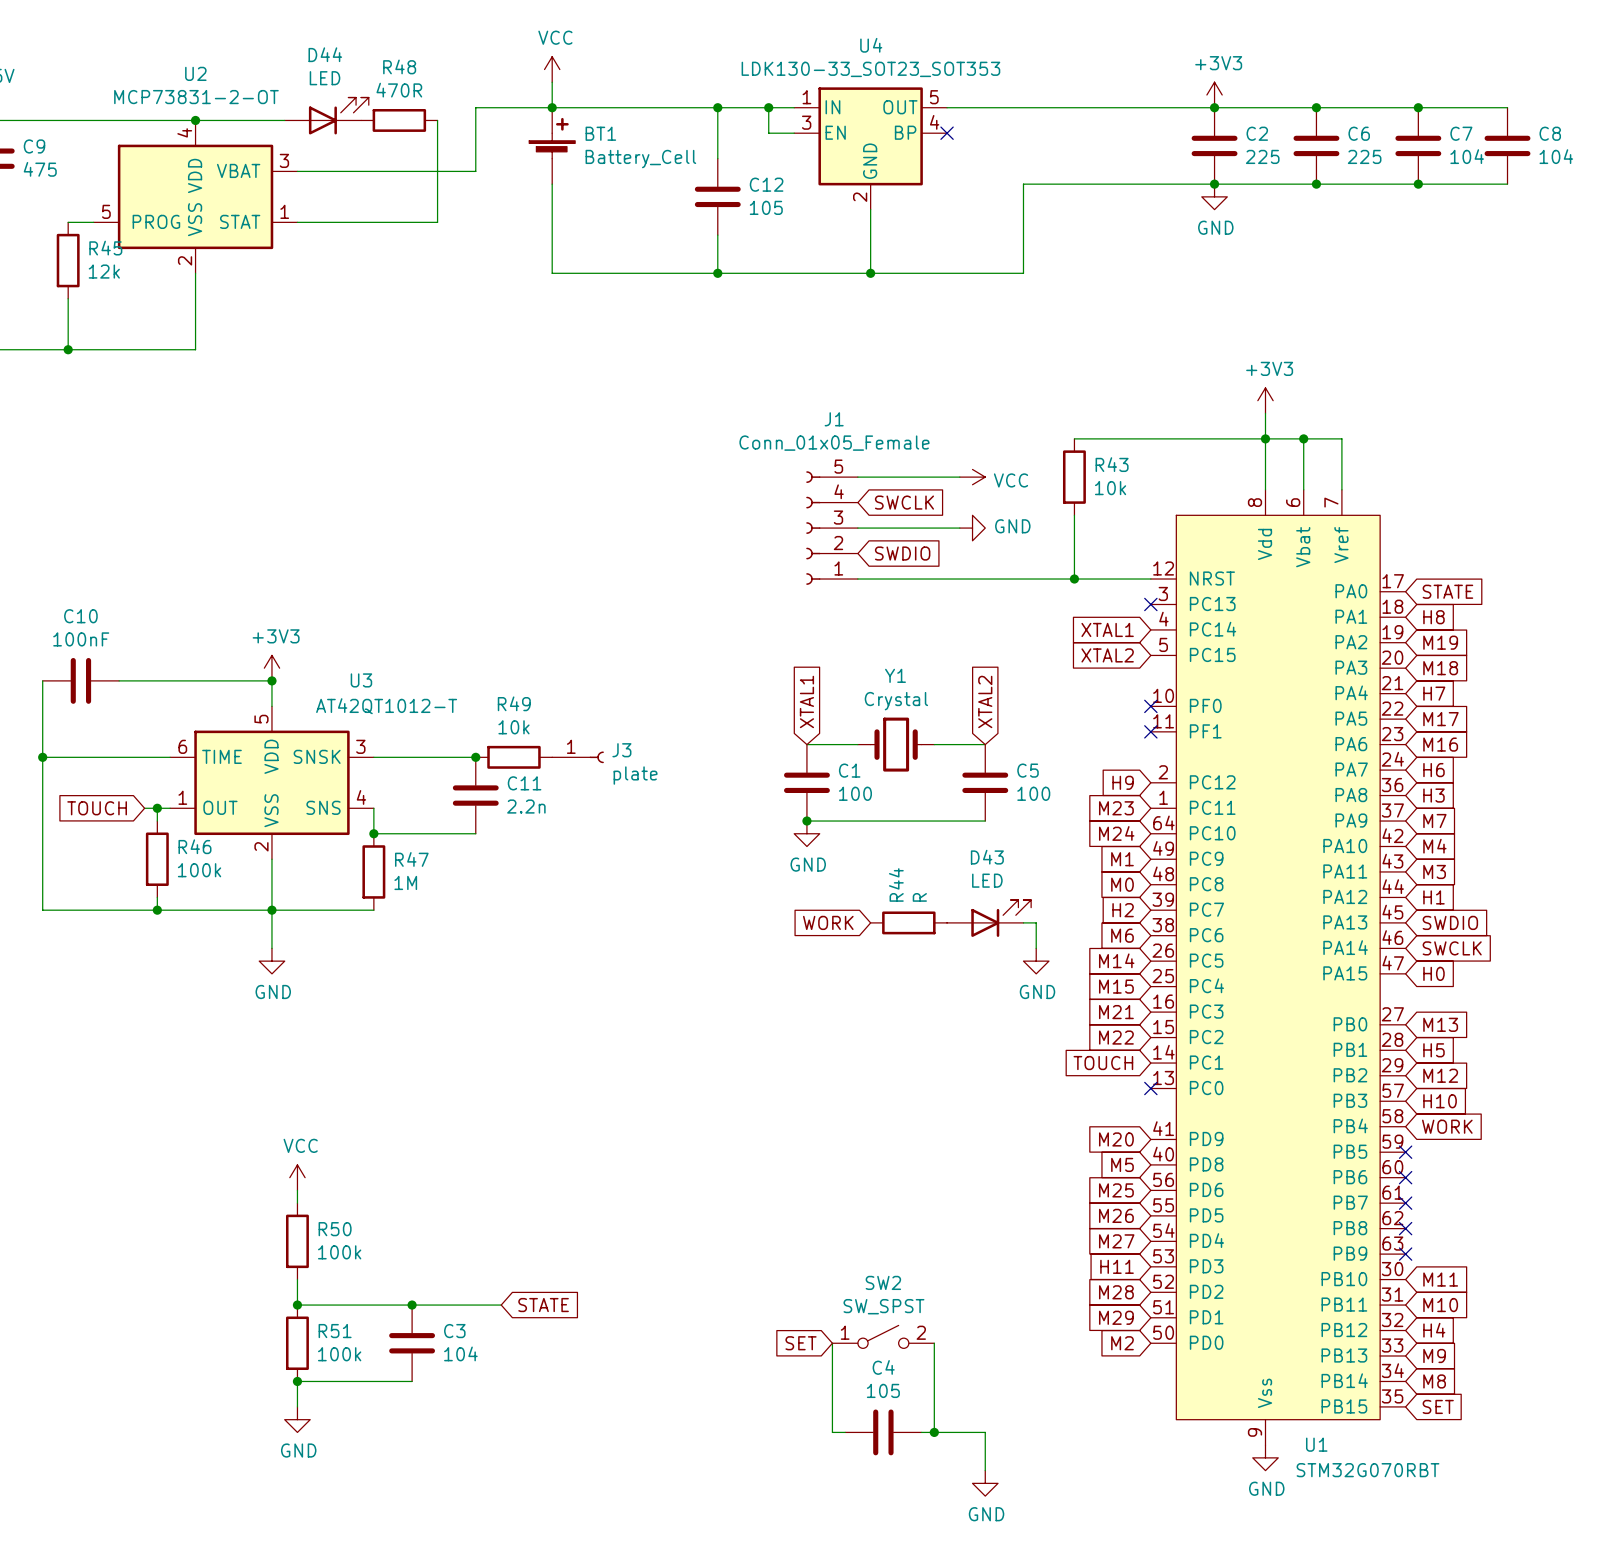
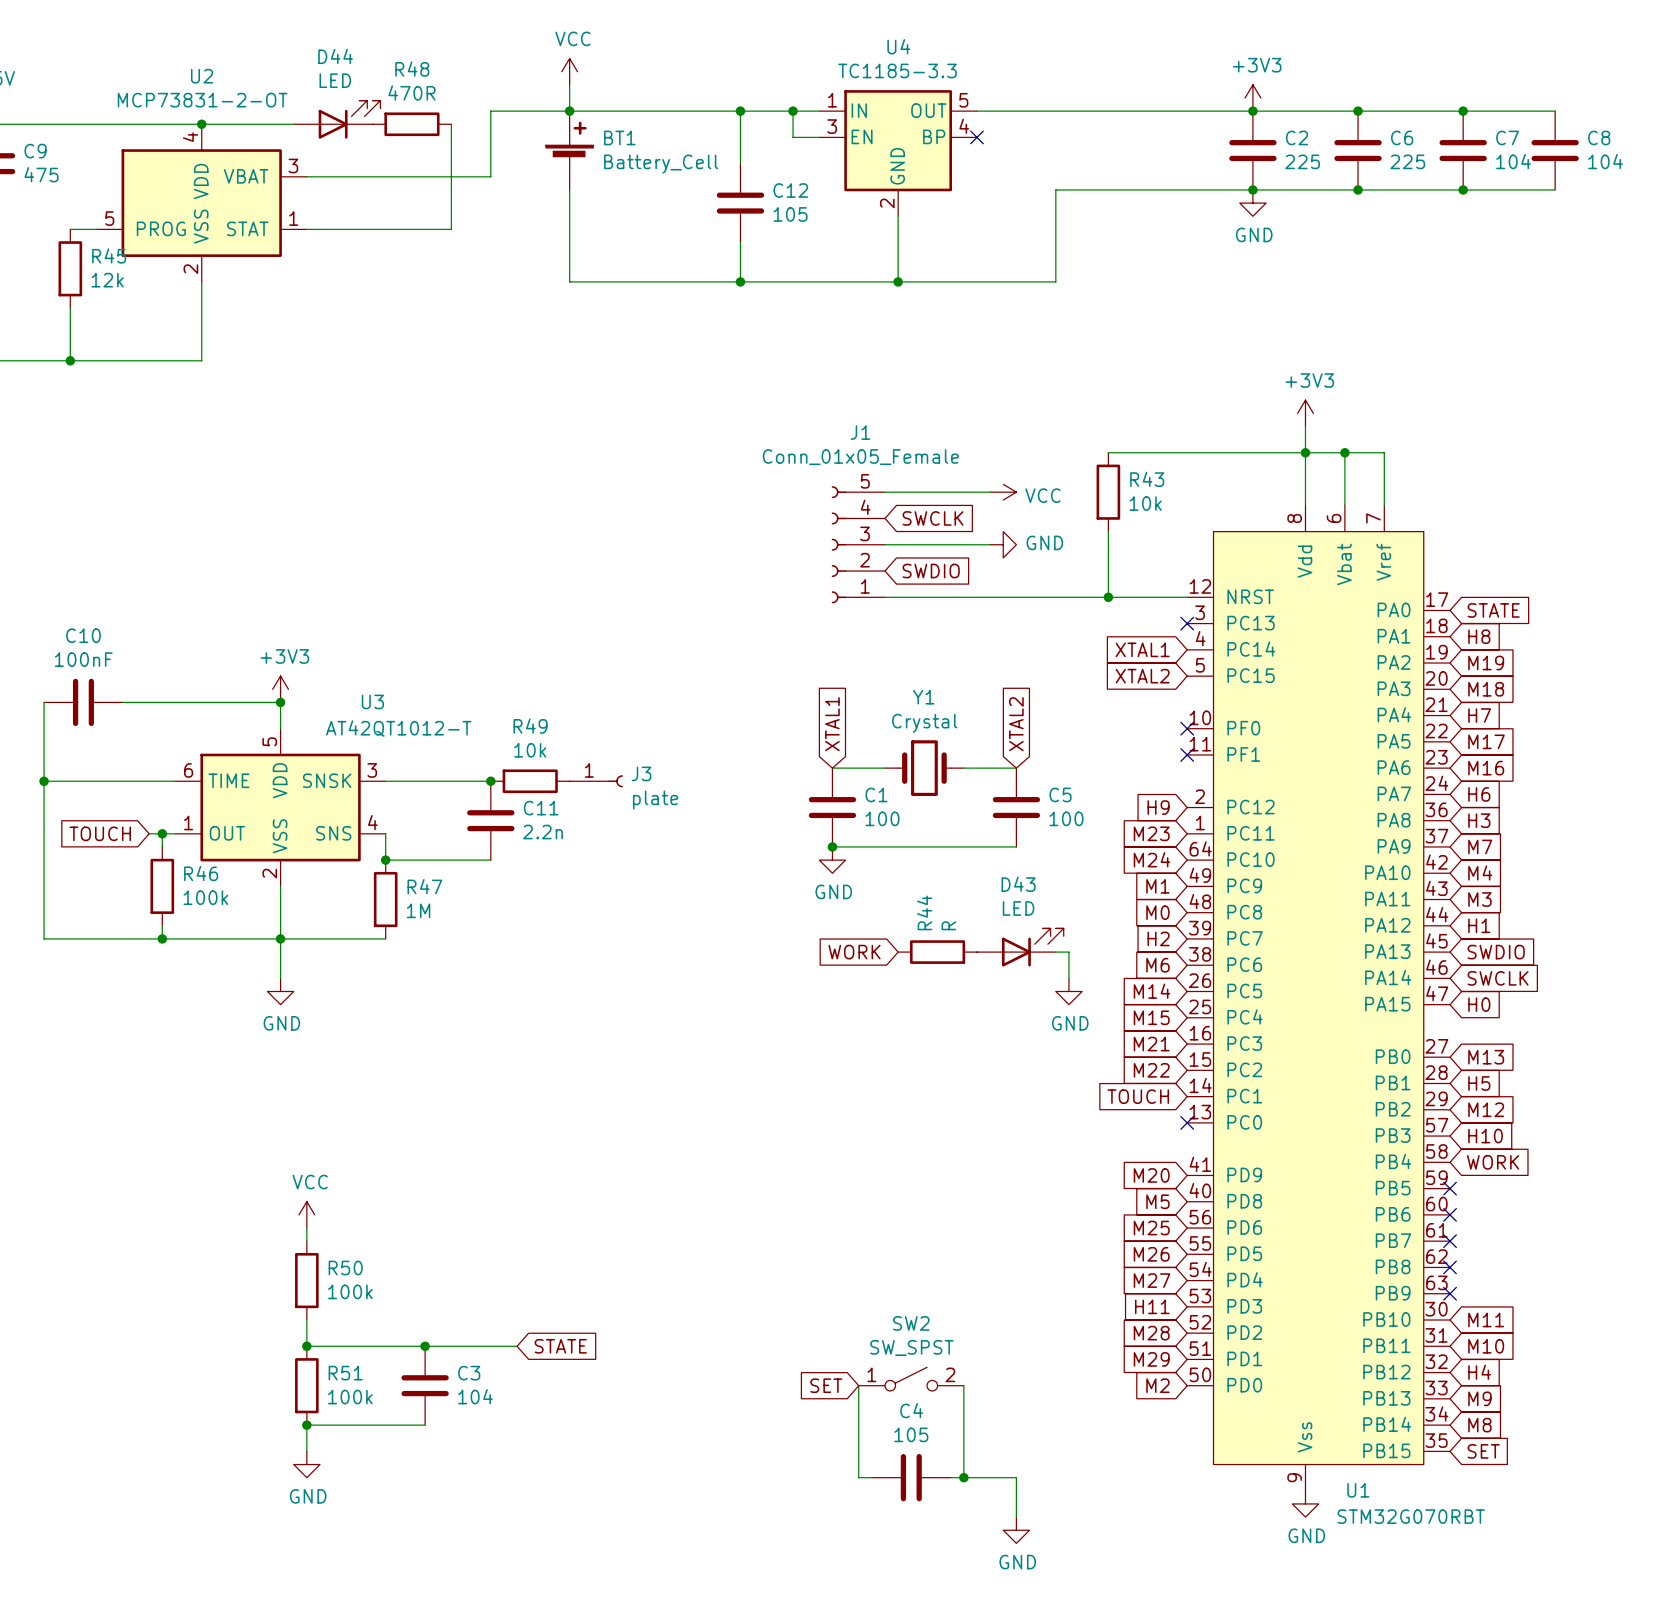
U4 value: LDK130-33_SOT23_SOT353 (870, 69) -> TC1185-3.3 (897, 70)

